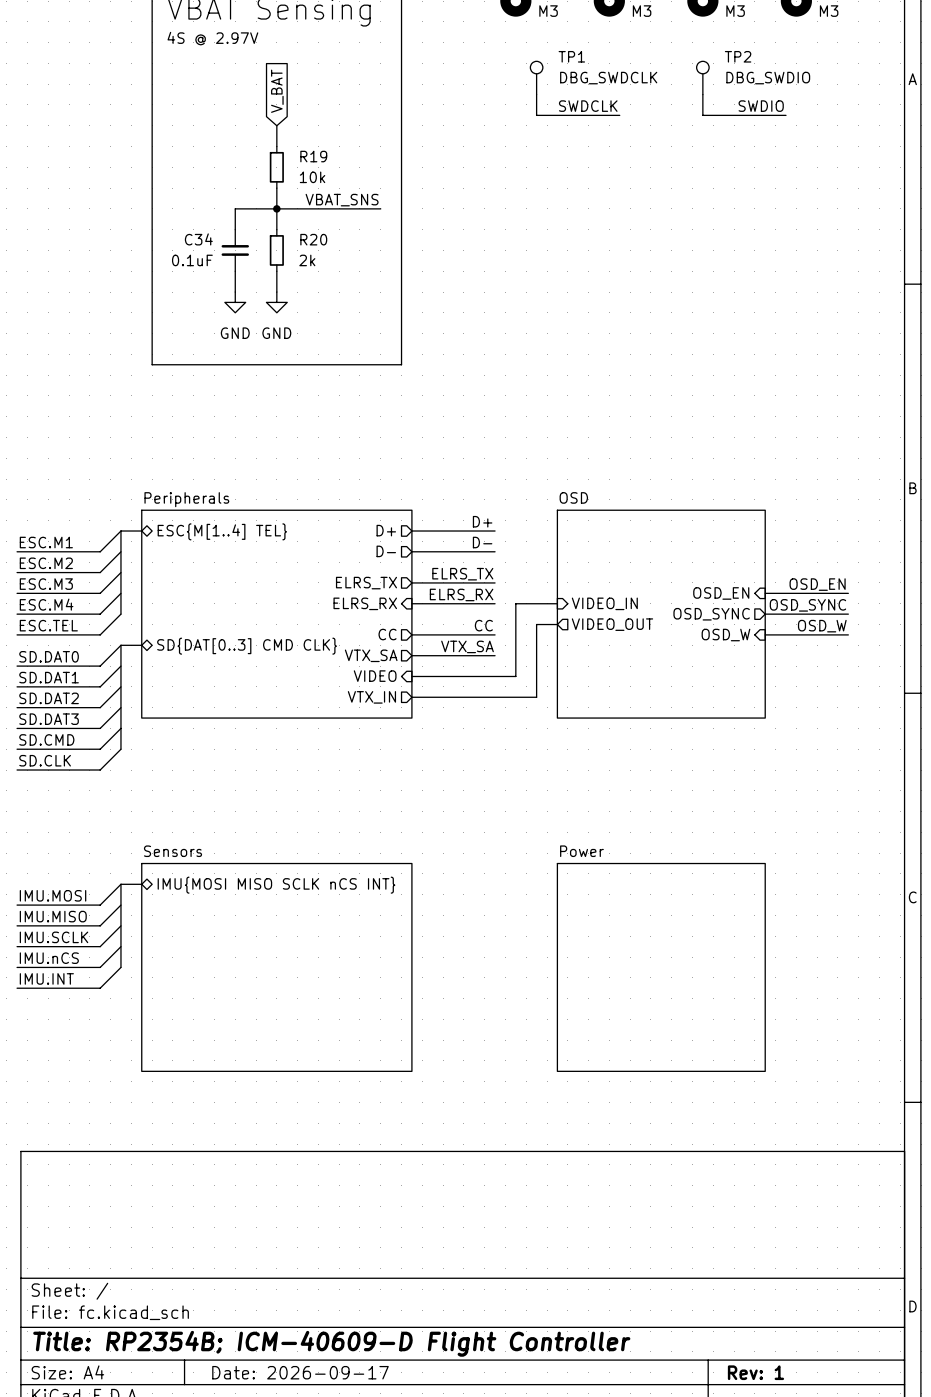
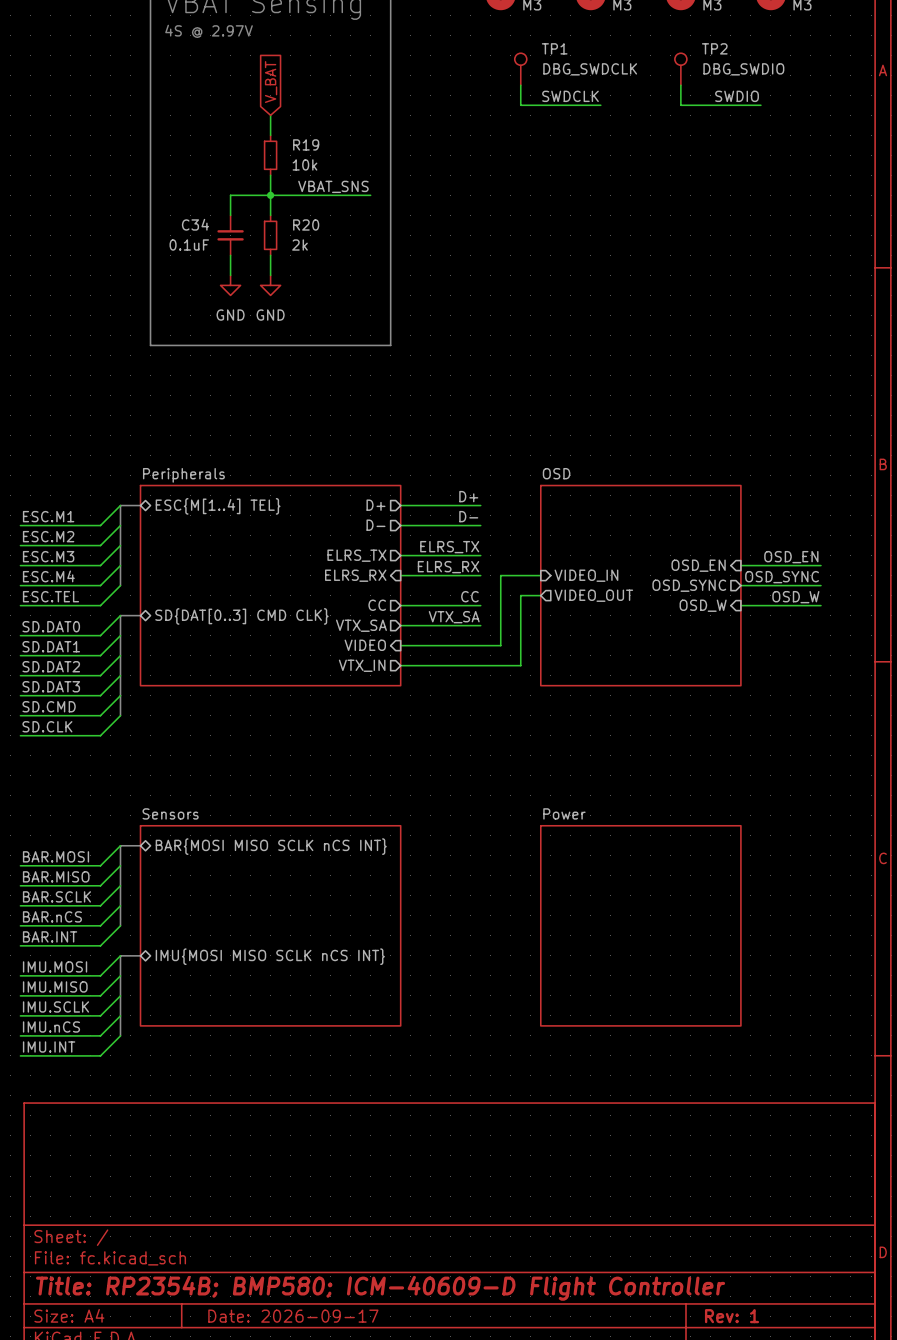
sheet pin: IMU{MOSI MISO SCLK nCS INT} (276, 885) -> BAR{MOSI MISO SCLK nCS INT} (271, 846)
label: IMU.MOSI (53, 895) -> BAR.MOSI (56, 856)
label: IMU.MISO (53, 916) -> BAR.MISO (56, 876)
label: IMU.SCLK (54, 937) -> BAR.SCLK (56, 896)
label: IMU.nCS (49, 958) -> BAR.nCS (52, 916)
label: IMU.INT (46, 978) -> BAR.INT (50, 936)
wire: none -> (120, 955) (100, 975) (20, 975)
bus: none -> (140, 955) (120, 955) (120, 1035)
sheet pin: none -> IMU{MOSI MISO SCLK nCS INT} (270, 956)
label: none -> IMU.MOSI (55, 966)
wire: none -> (120, 975) (100, 995) (20, 995)
label: none -> IMU.MISO (55, 986)
wire: none -> (120, 995) (100, 1015) (20, 1015)
label: none -> IMU.SCLK (56, 1006)
wire: none -> (120, 1015) (100, 1035) (20, 1035)
label: none -> IMU.nCS (51, 1026)
wire: none -> (120, 1035) (100, 1055) (20, 1055)
label: none -> IMU.INT (49, 1046)
title block: Title: RP2354B; ICM-40609-D Flight Controller (331, 1343) -> Title: RP2354B; BMP580; ICM-40609-D Flight Controller (380, 1288)

